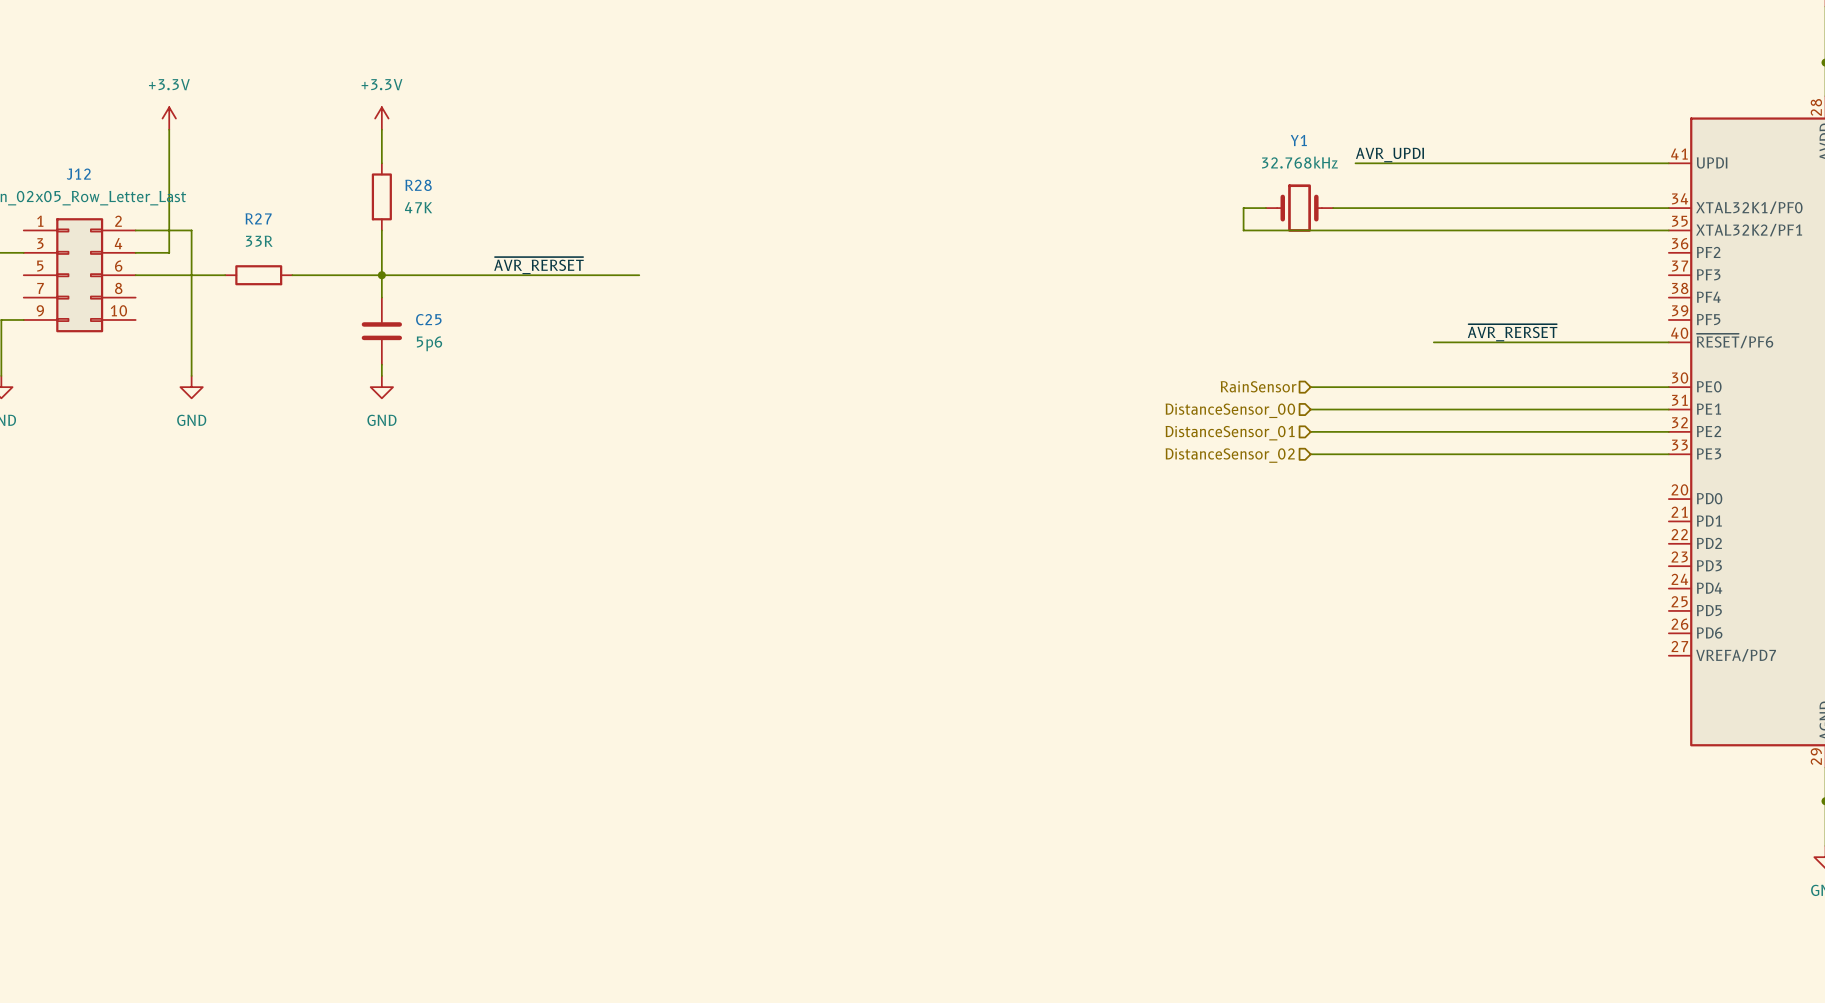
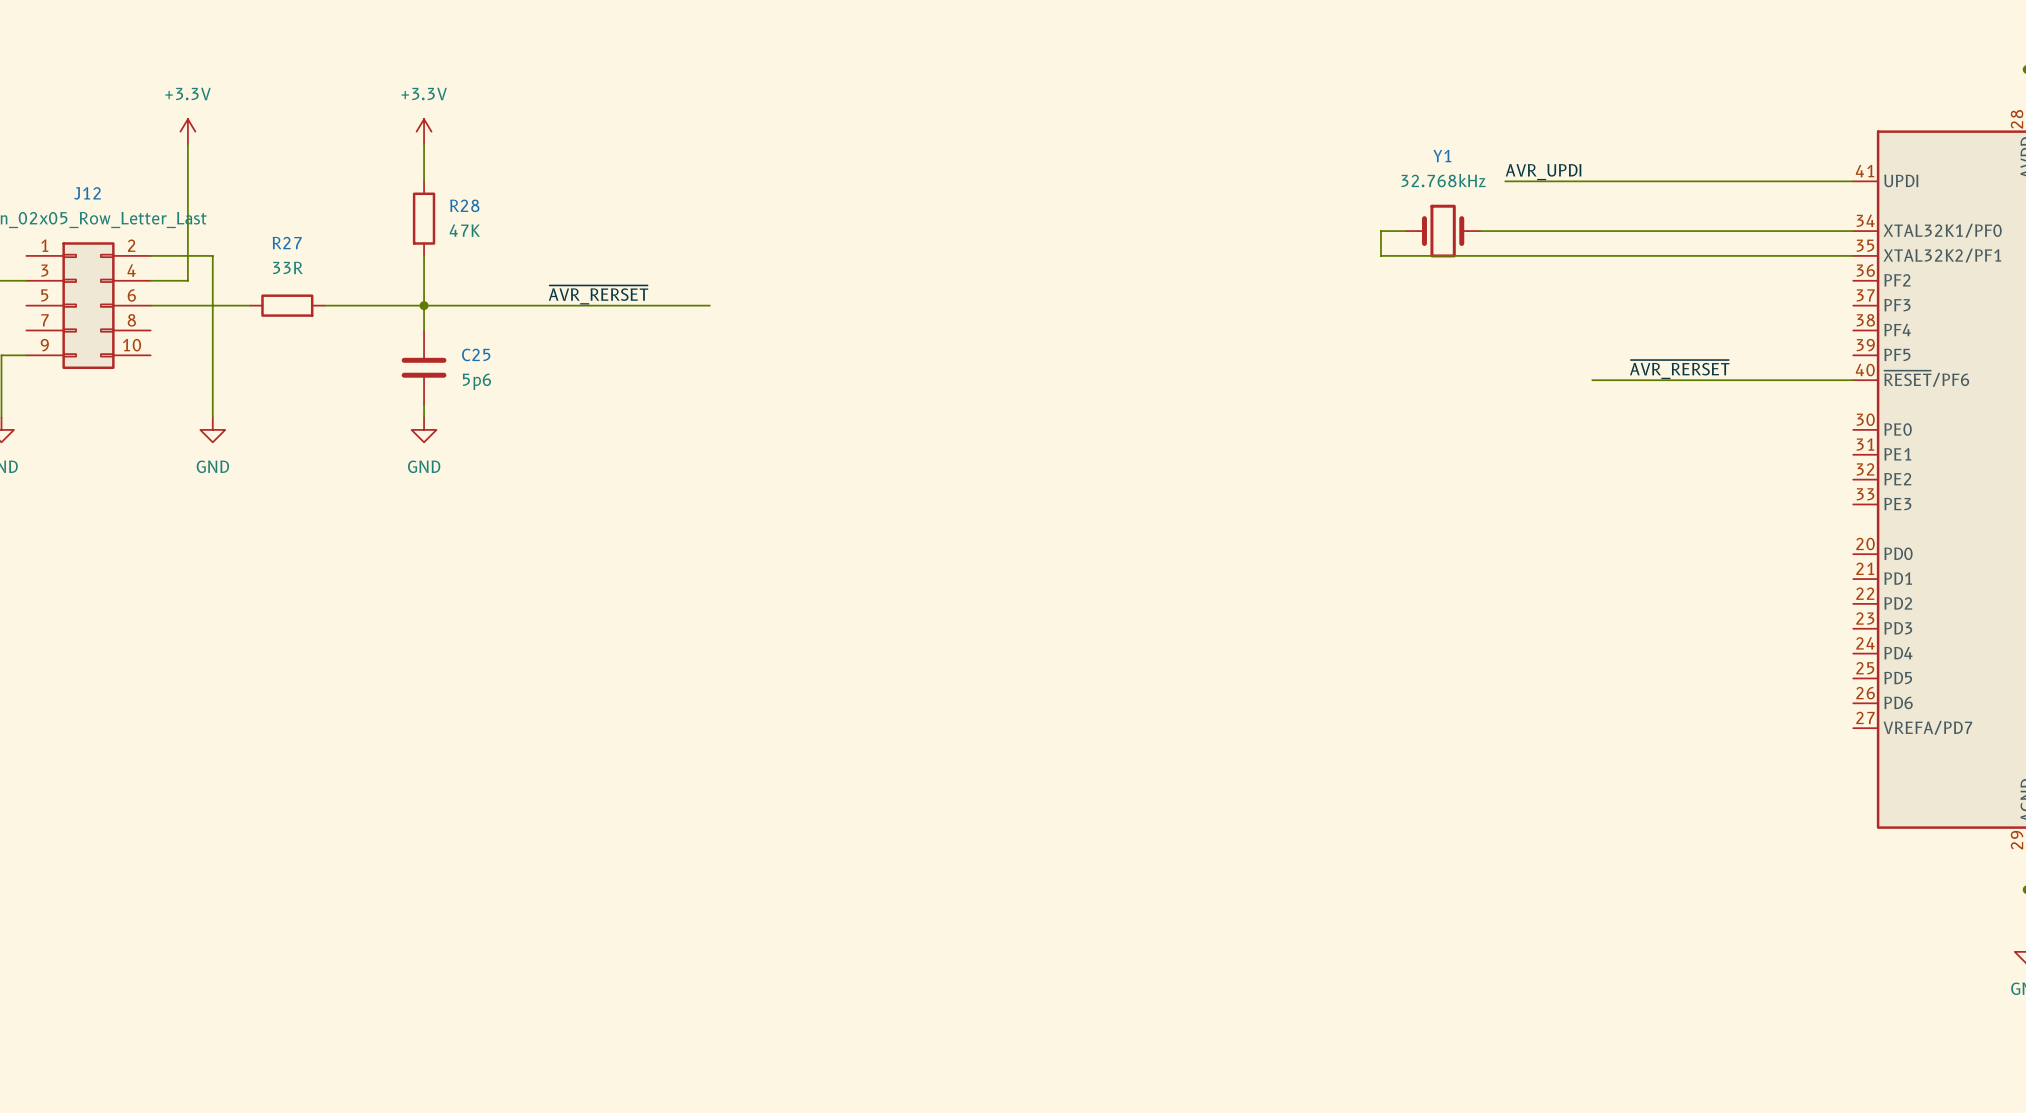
hierarchical label: RainSensor (1258, 386) -> none
wire: (1310, 387) (1668, 387) -> none
wire: (1310, 409) (1668, 409) -> none
hierarchical label: DistanceSensor_00 (1230, 410) -> none
wire: (1310, 431) (1668, 431) -> none
hierarchical label: DistanceSensor_01 (1230, 433) -> none
wire: (1310, 454) (1668, 454) -> none
hierarchical label: DistanceSensor_02 (1230, 455) -> none

